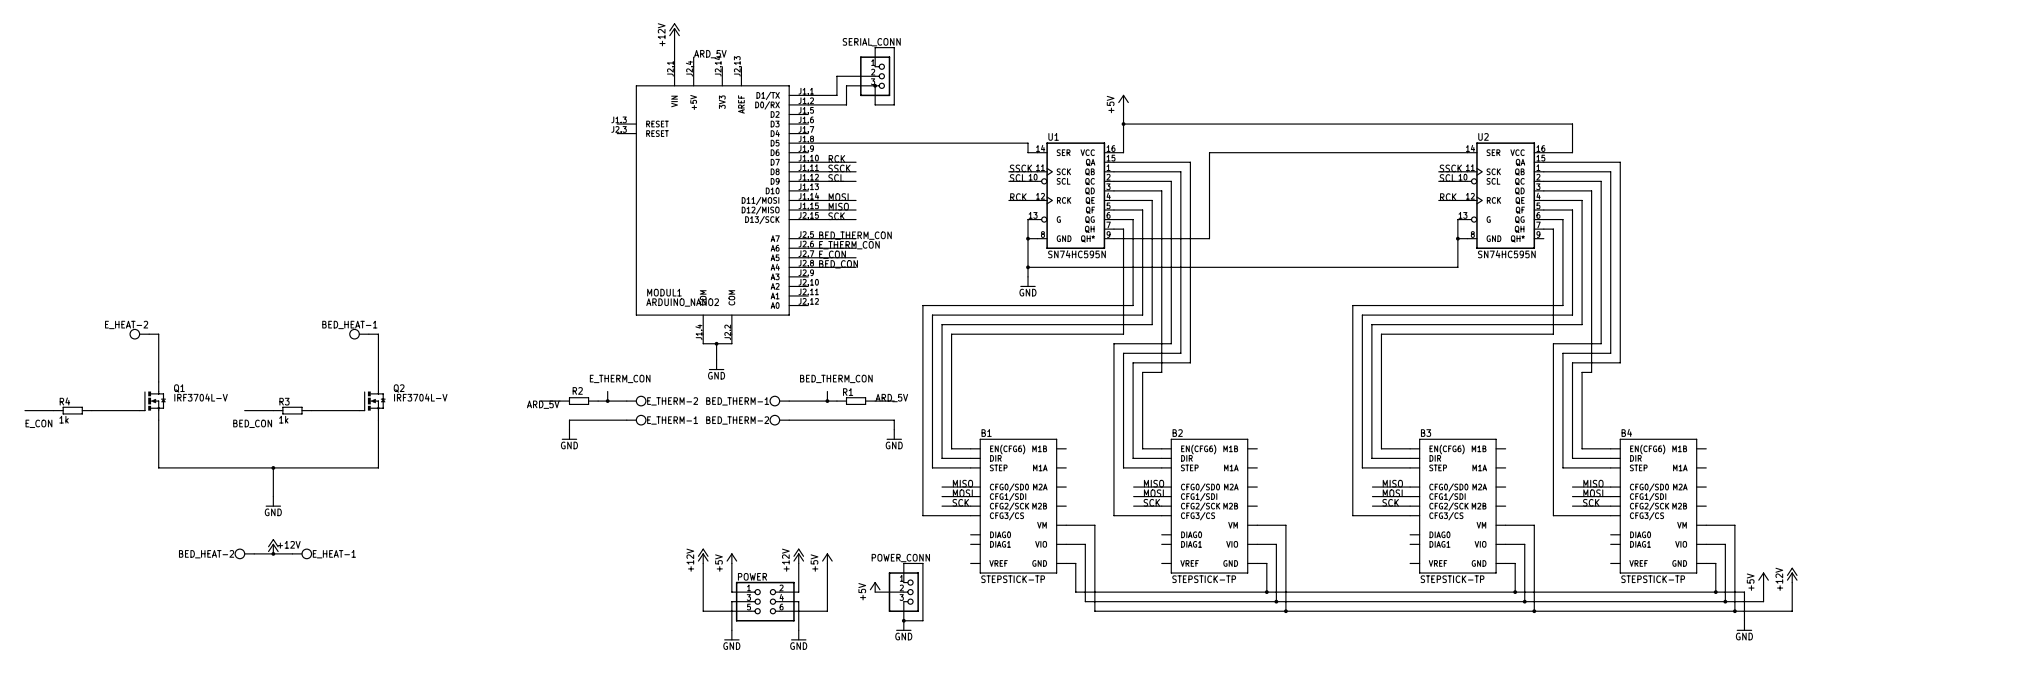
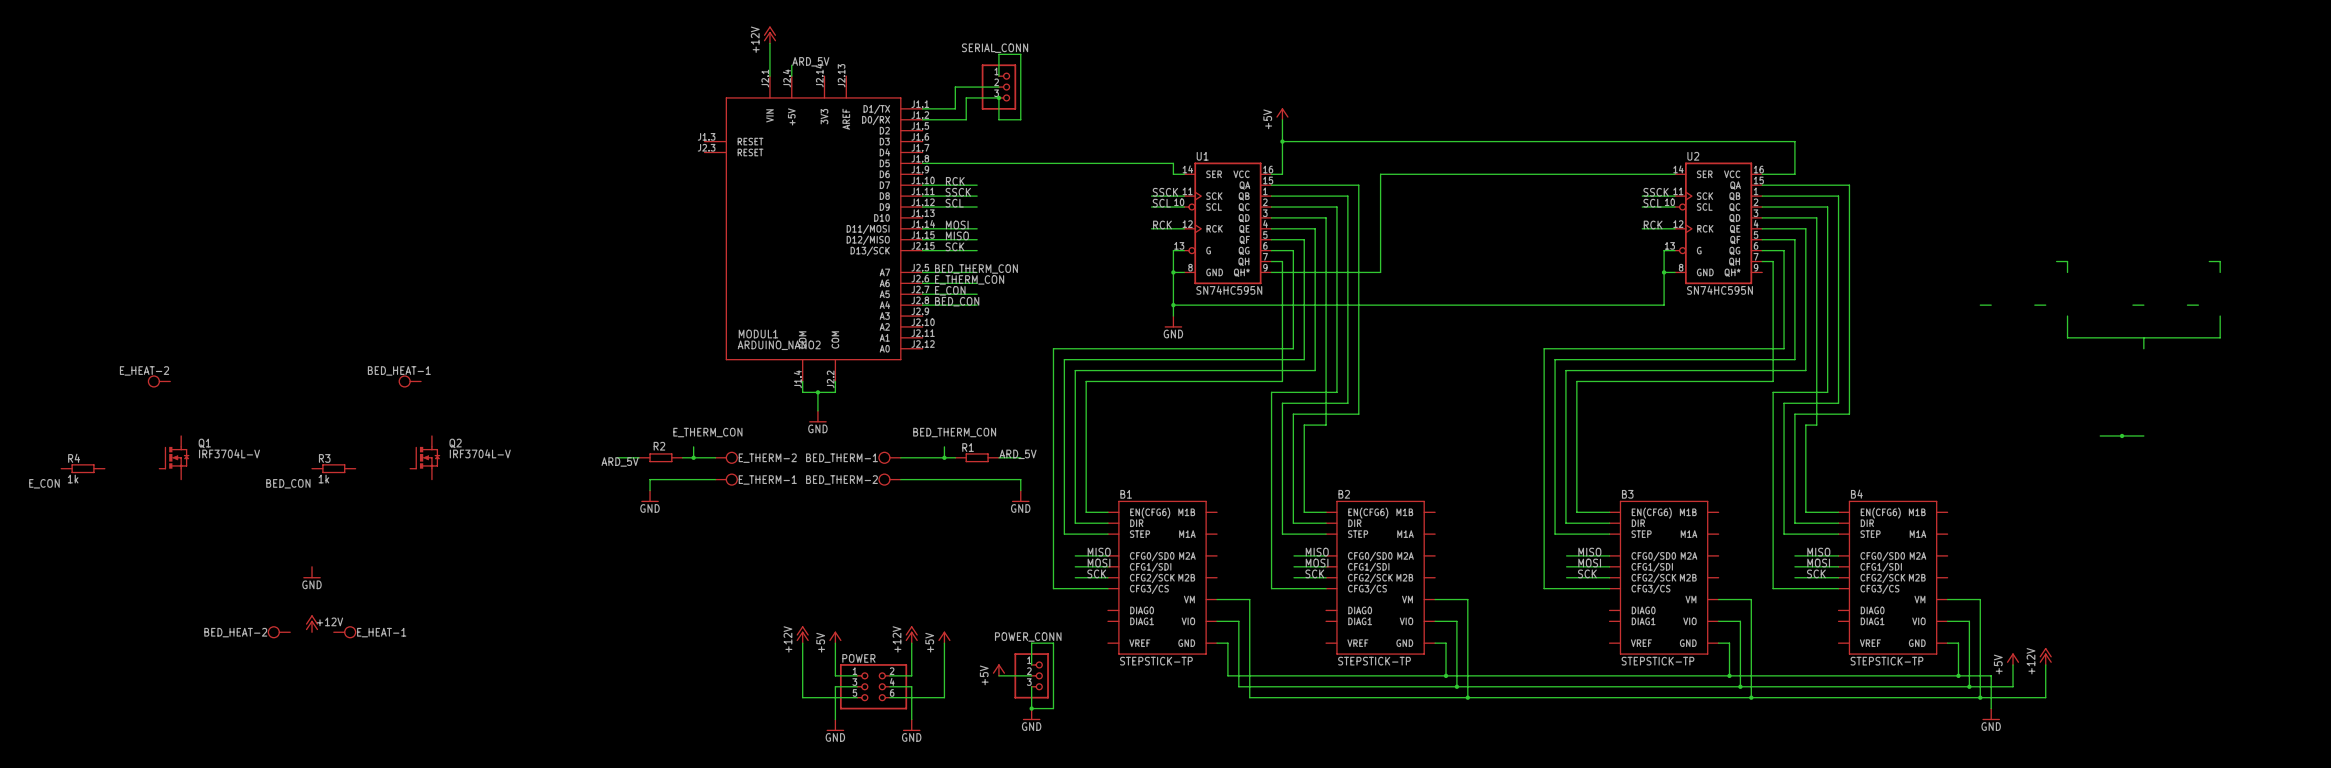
wire: none -> (2056, 261) (2067, 261) (2067, 272)
wire: none -> (2209, 261) (2220, 261) (2220, 272)
wire: none -> (1980, 305) (1991, 305)
wire: none -> (2034, 305) (2045, 305)
wire: none -> (2132, 305) (2143, 305)
wire: none -> (2187, 305) (2198, 305)
wire: none -> (2067, 316) (2067, 337) (2220, 337) (2220, 316)
wire: none -> (2143, 337) (2143, 348)
wire: (149, 334) (158, 334) (158, 381) -> none
wire: (368, 334) (378, 334) (378, 381) -> none
wire: none -> (2100, 435) (2143, 435)
junction: none -> (2122, 435)
wire: (24, 410) (53, 410) -> none
wire: (91, 410) (139, 410) -> none
wire: (244, 410) (273, 410) -> none
wire: (311, 410) (359, 410) -> none
wire: (158, 420) (158, 467) (378, 467) (378, 420) -> none
wire: (273, 467) (273, 496) -> none
junction: (273, 467) -> none
wire: (254, 553) (292, 553) -> none
junction: (273, 553) -> none

